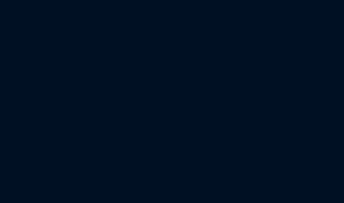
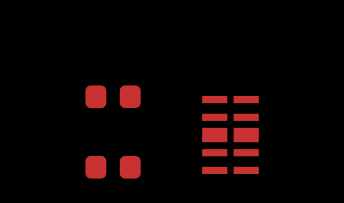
part: none -> (113, 96)
part: none -> (230, 135)
part: none -> (113, 167)

